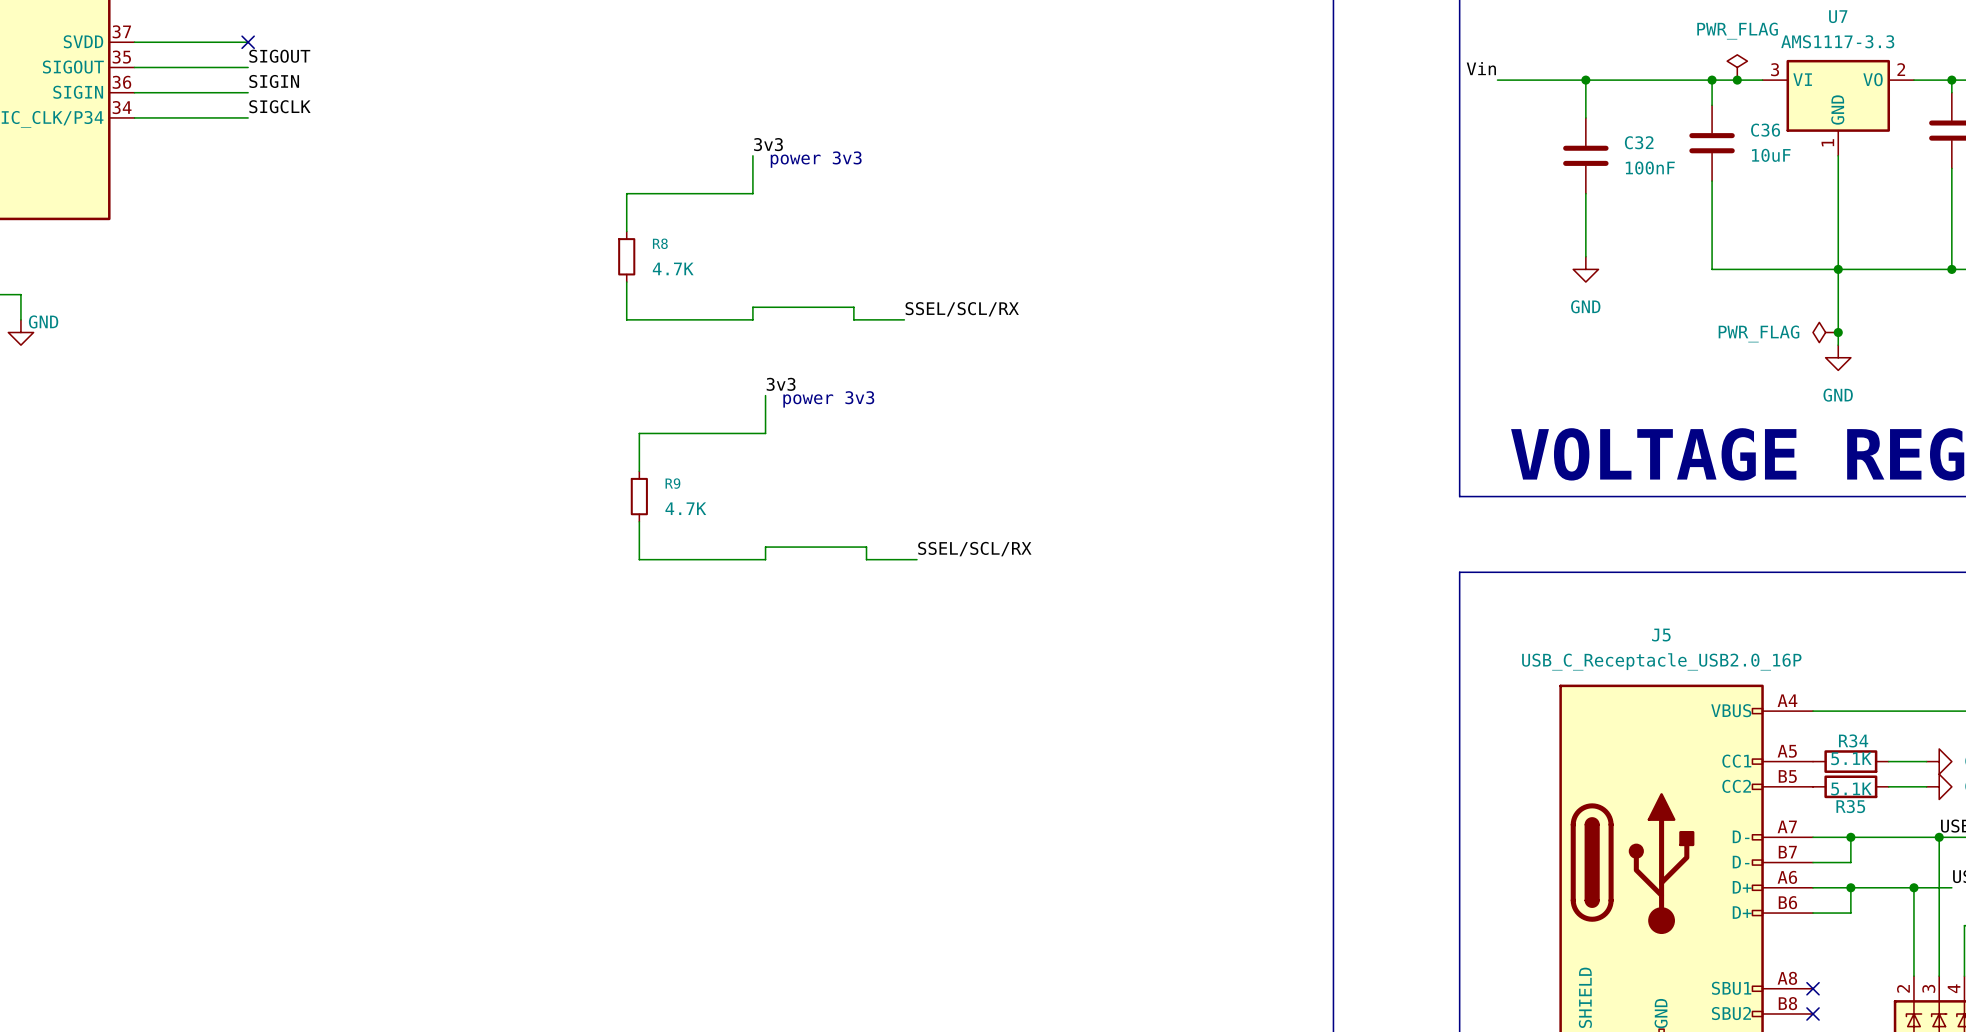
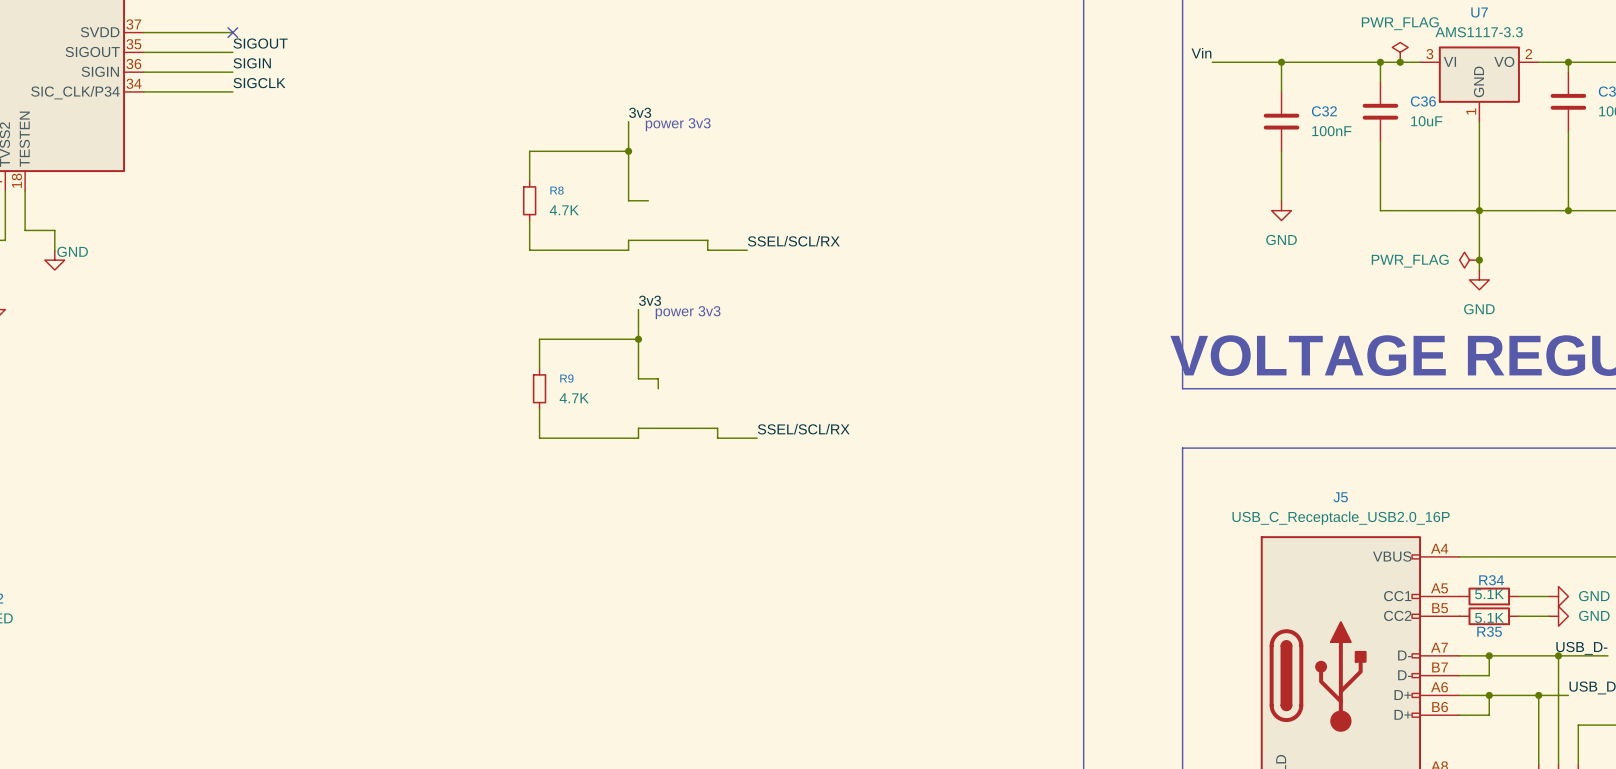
wire: none -> (628, 151) (628, 200) (648, 200)
junction: none -> (628, 151)
wire: none -> (638, 339) (638, 378) (658, 378) (658, 388)
junction: none -> (638, 339)

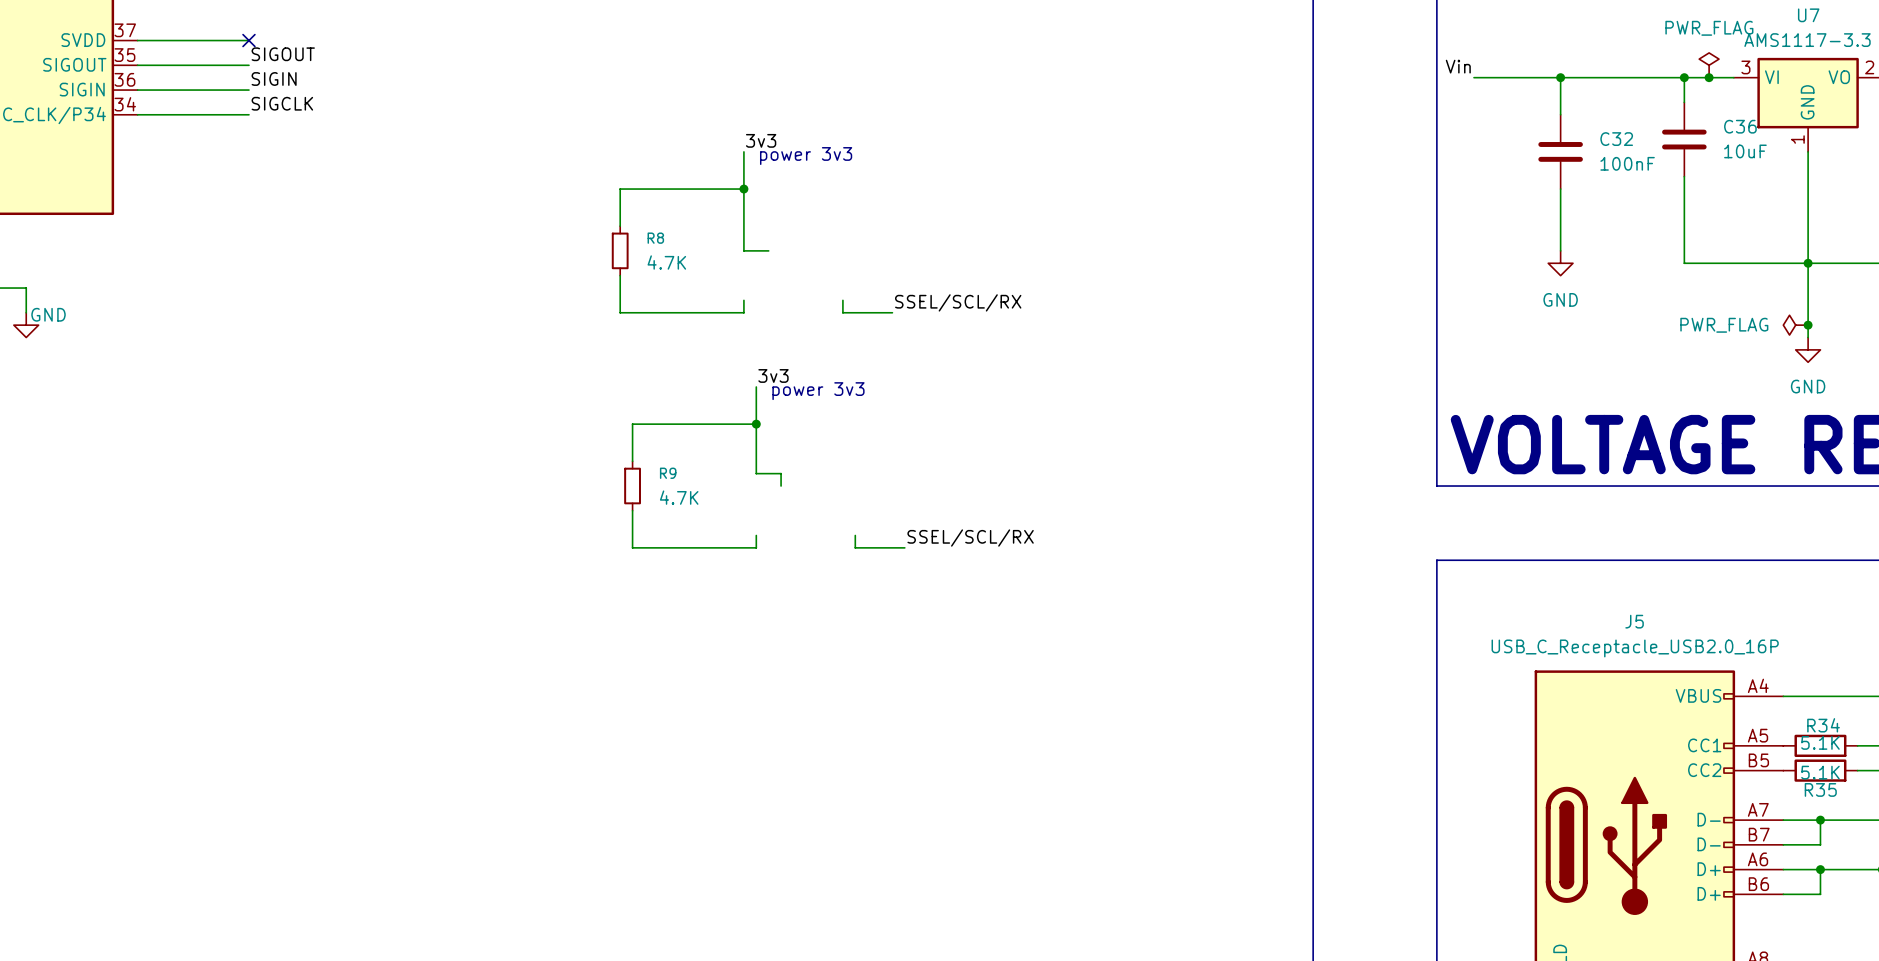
wire: (628, 240) (707, 240) -> none
wire: (638, 428) (717, 428) -> none

